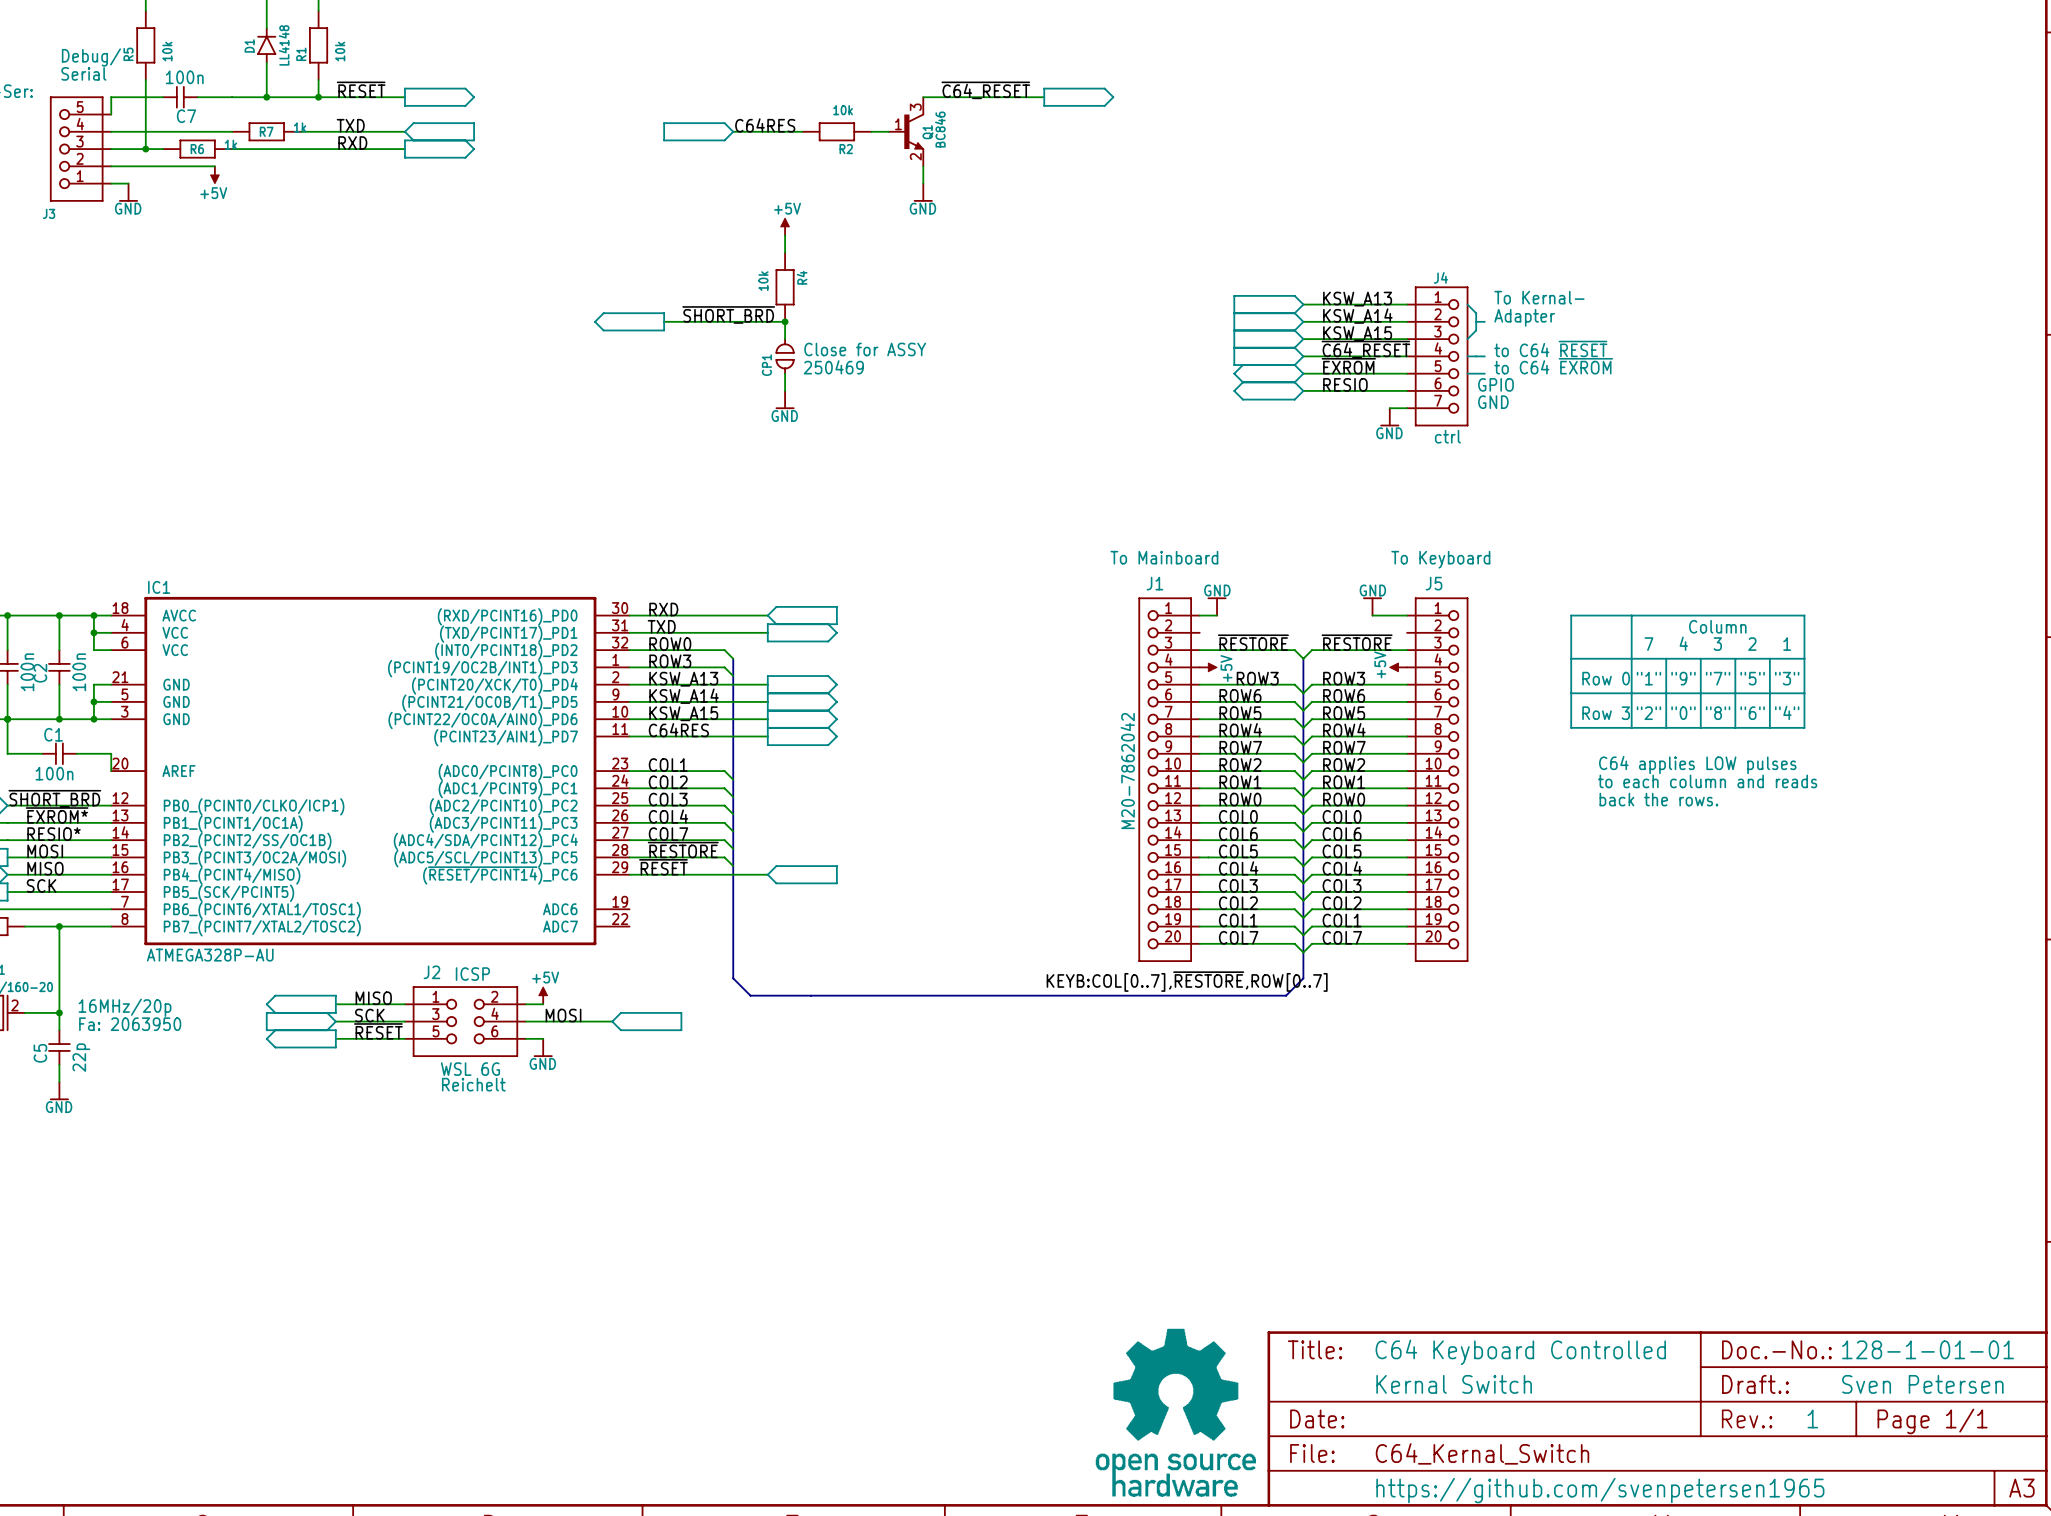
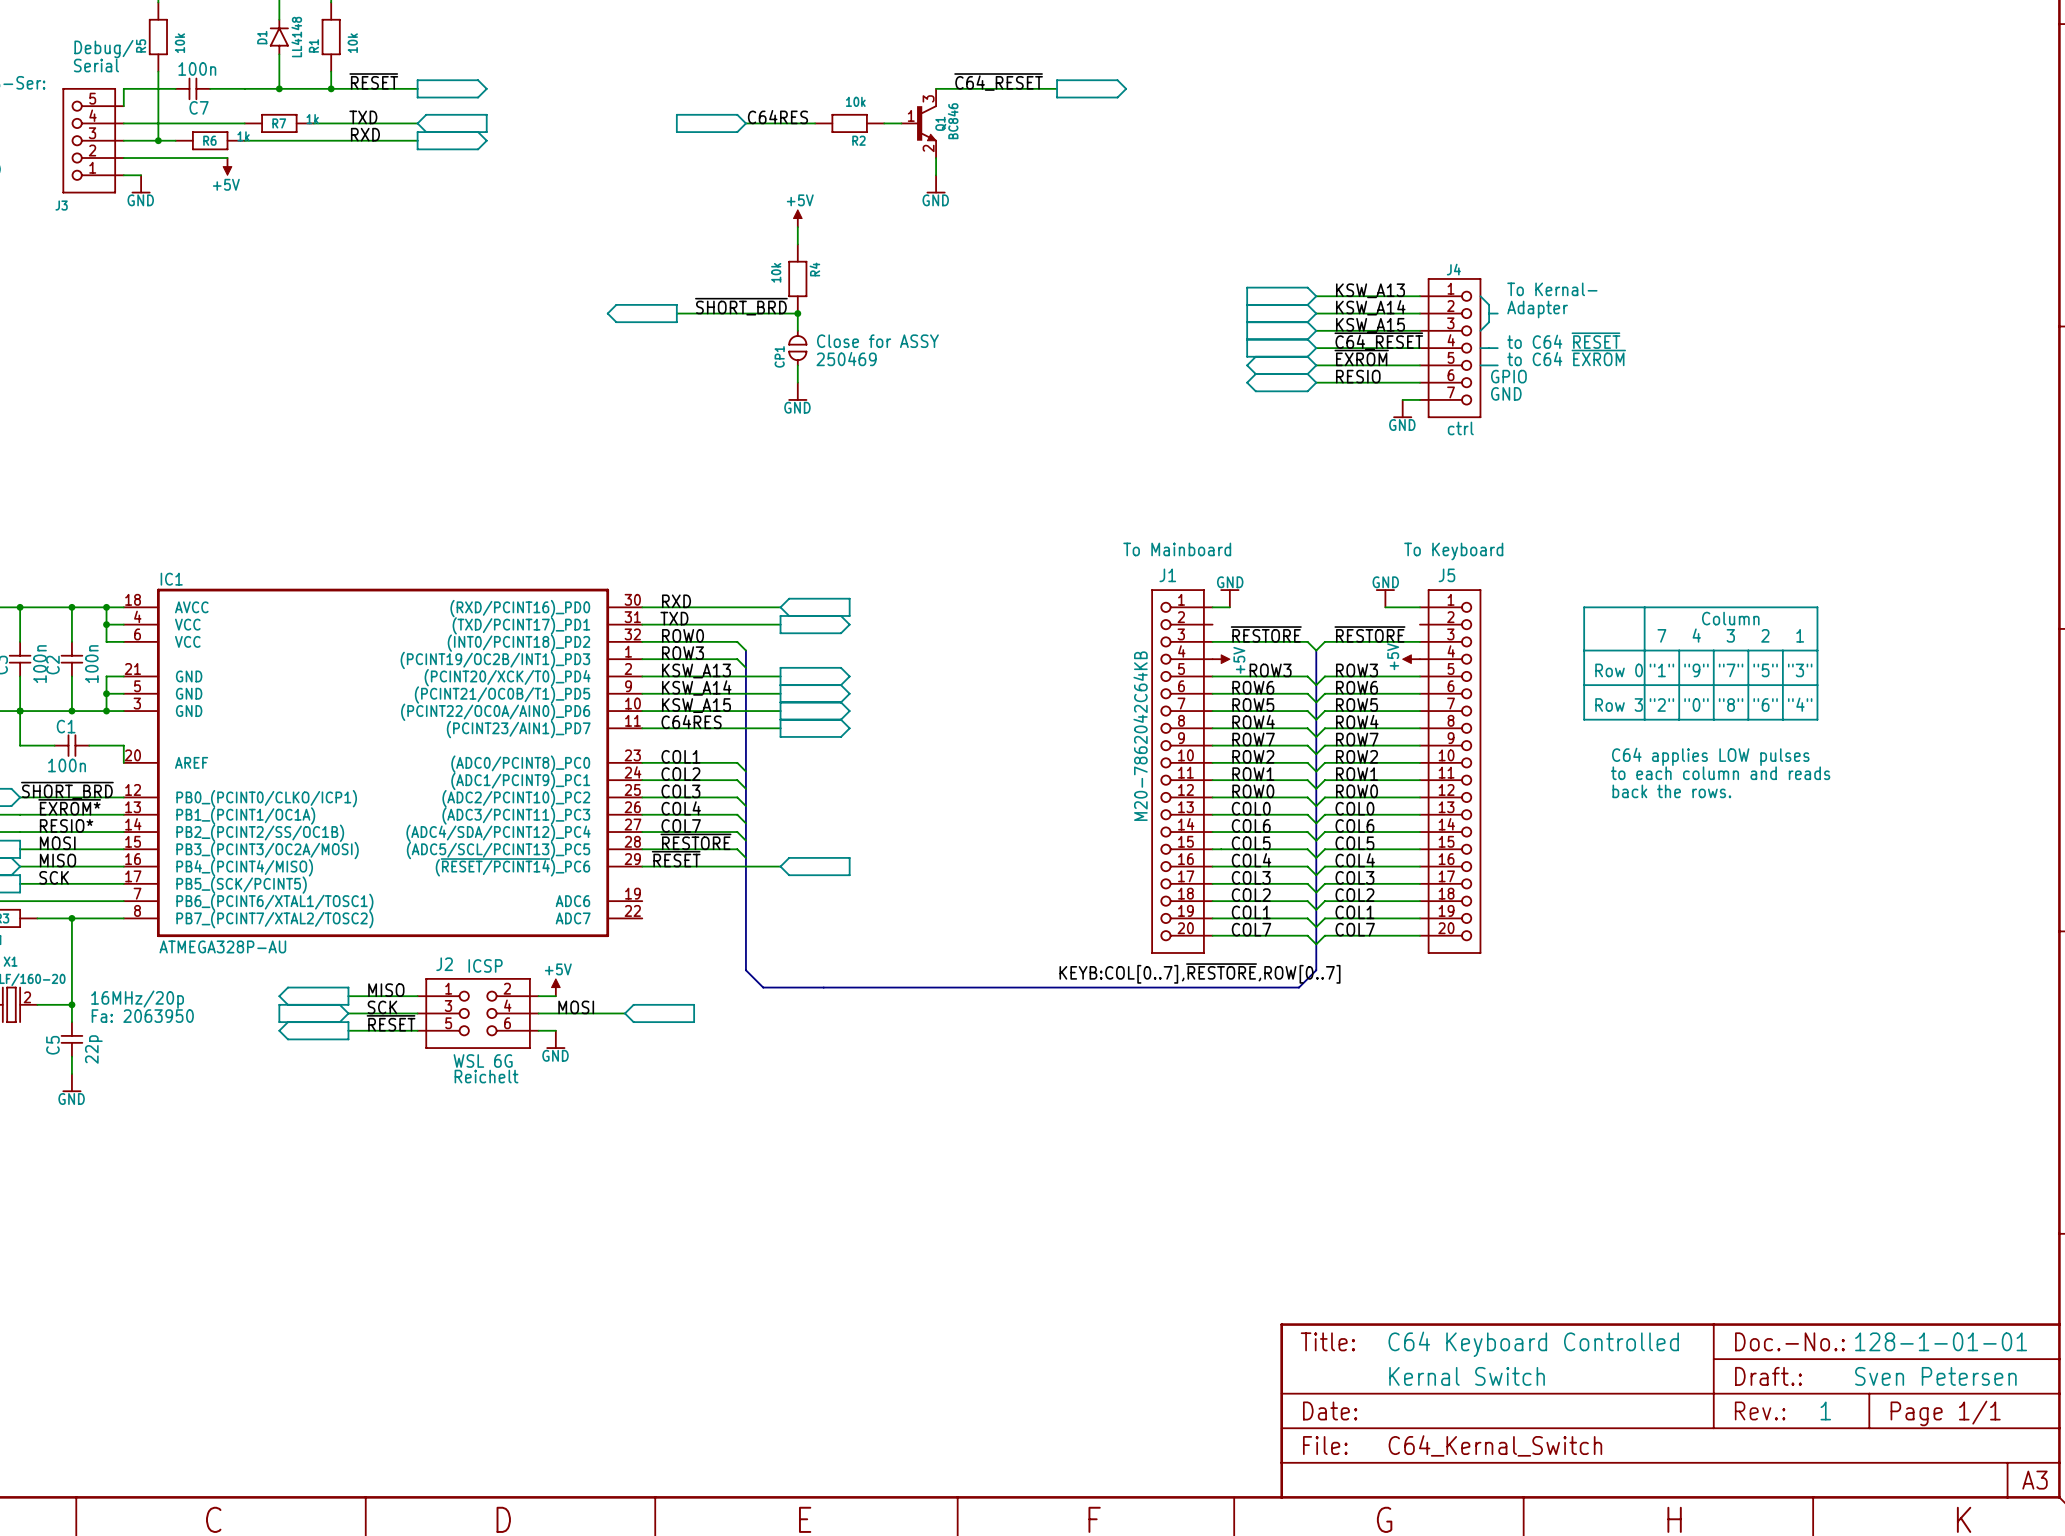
J1 value: M20-7862042 (1127, 771) -> M20-7862042C64KB (1140, 736)
part: (1175, 1412) -> none
text: https://github.com/svenpetersen1965 (1600, 1490) -> none

